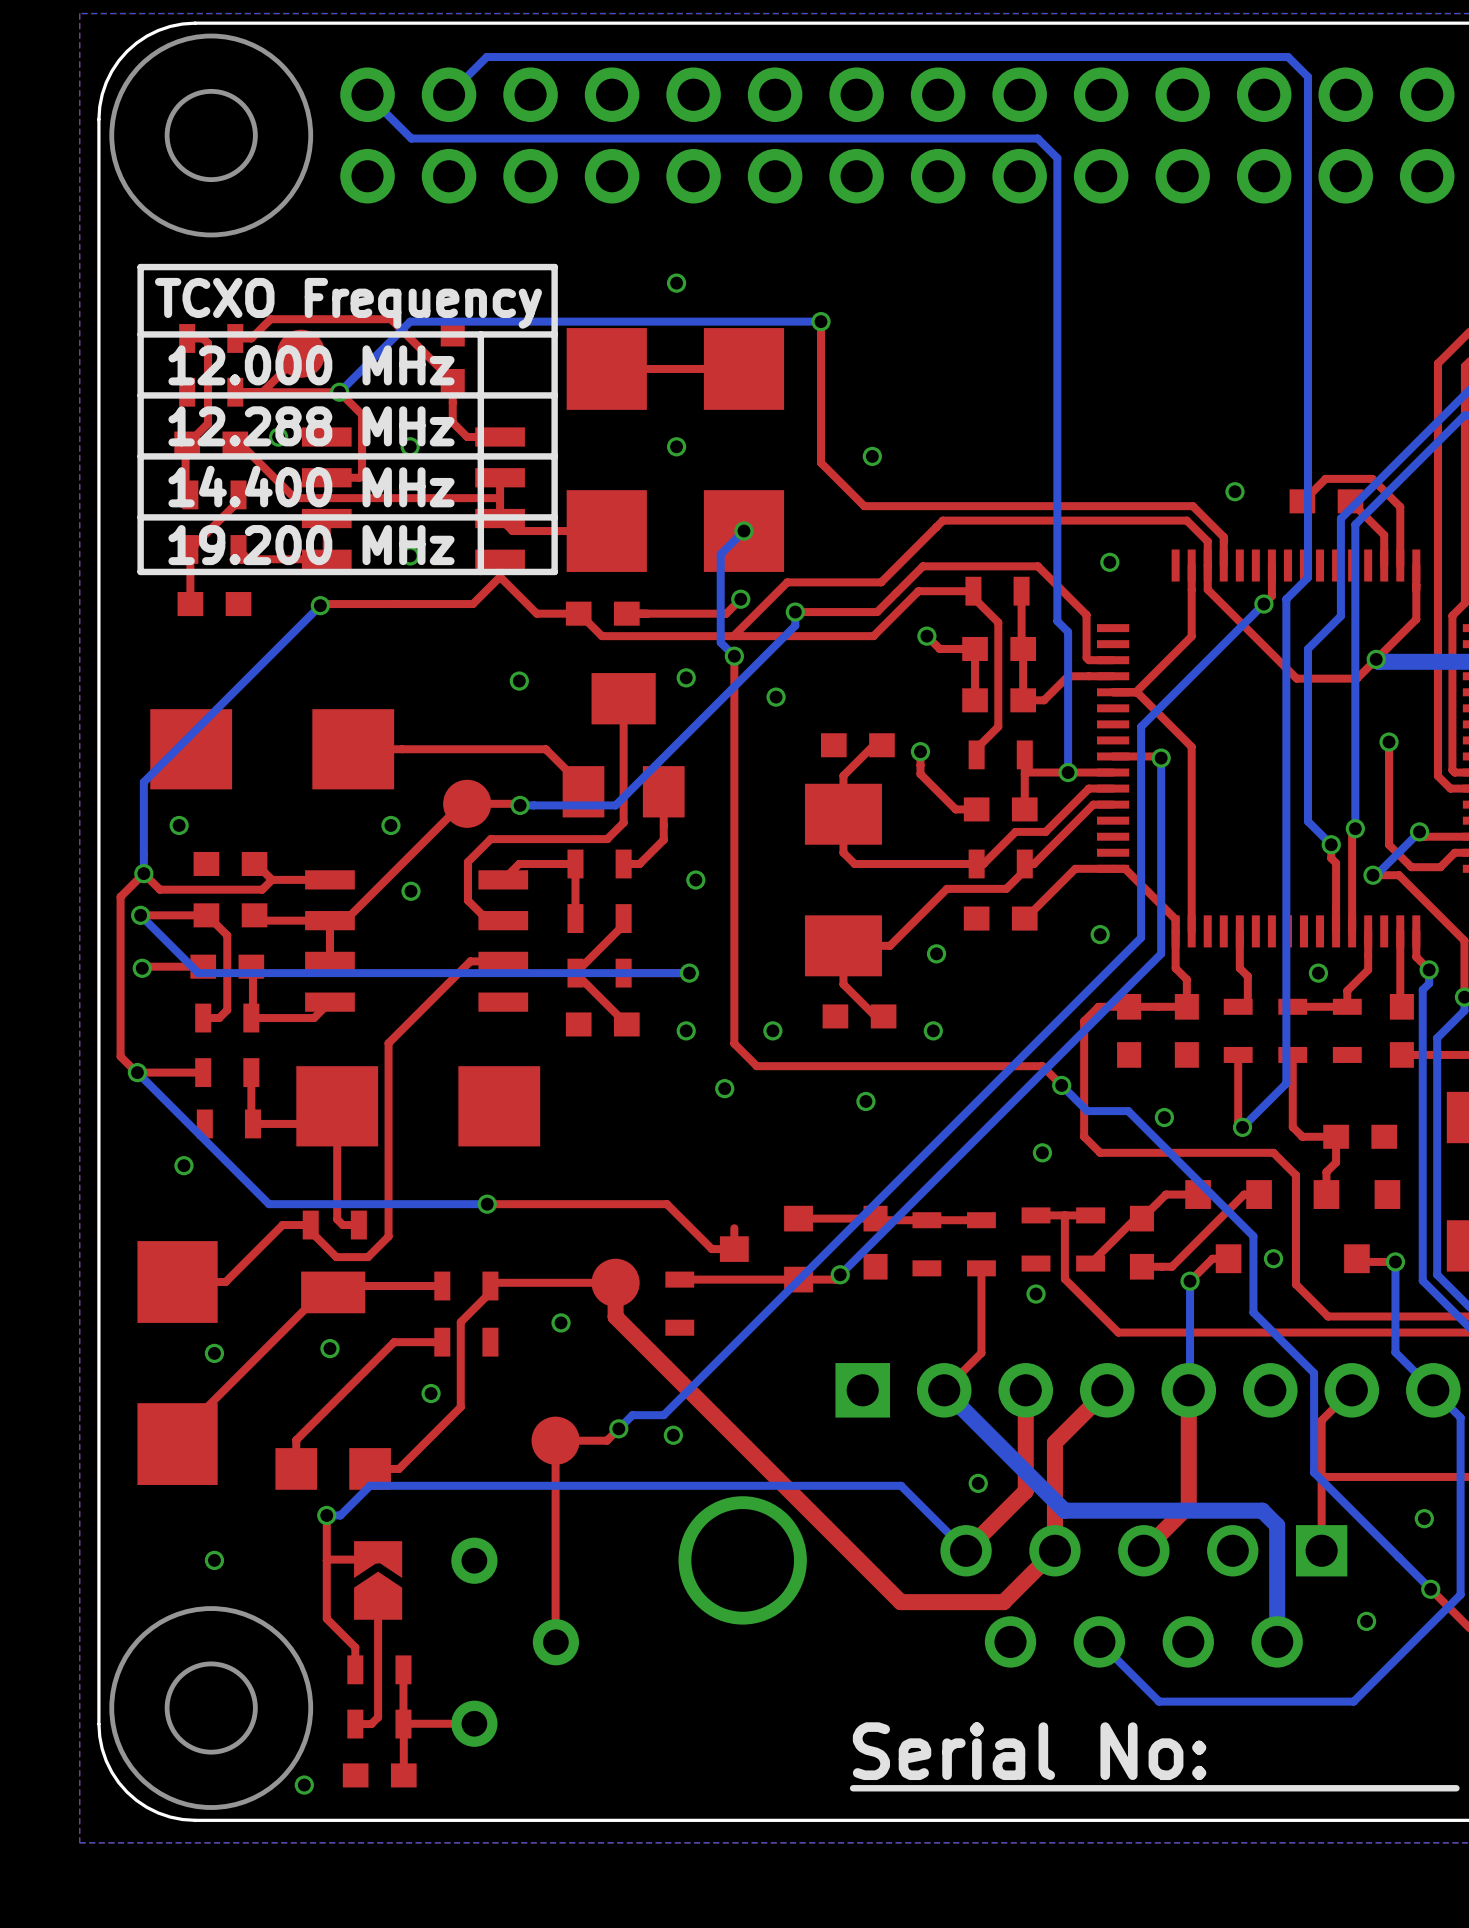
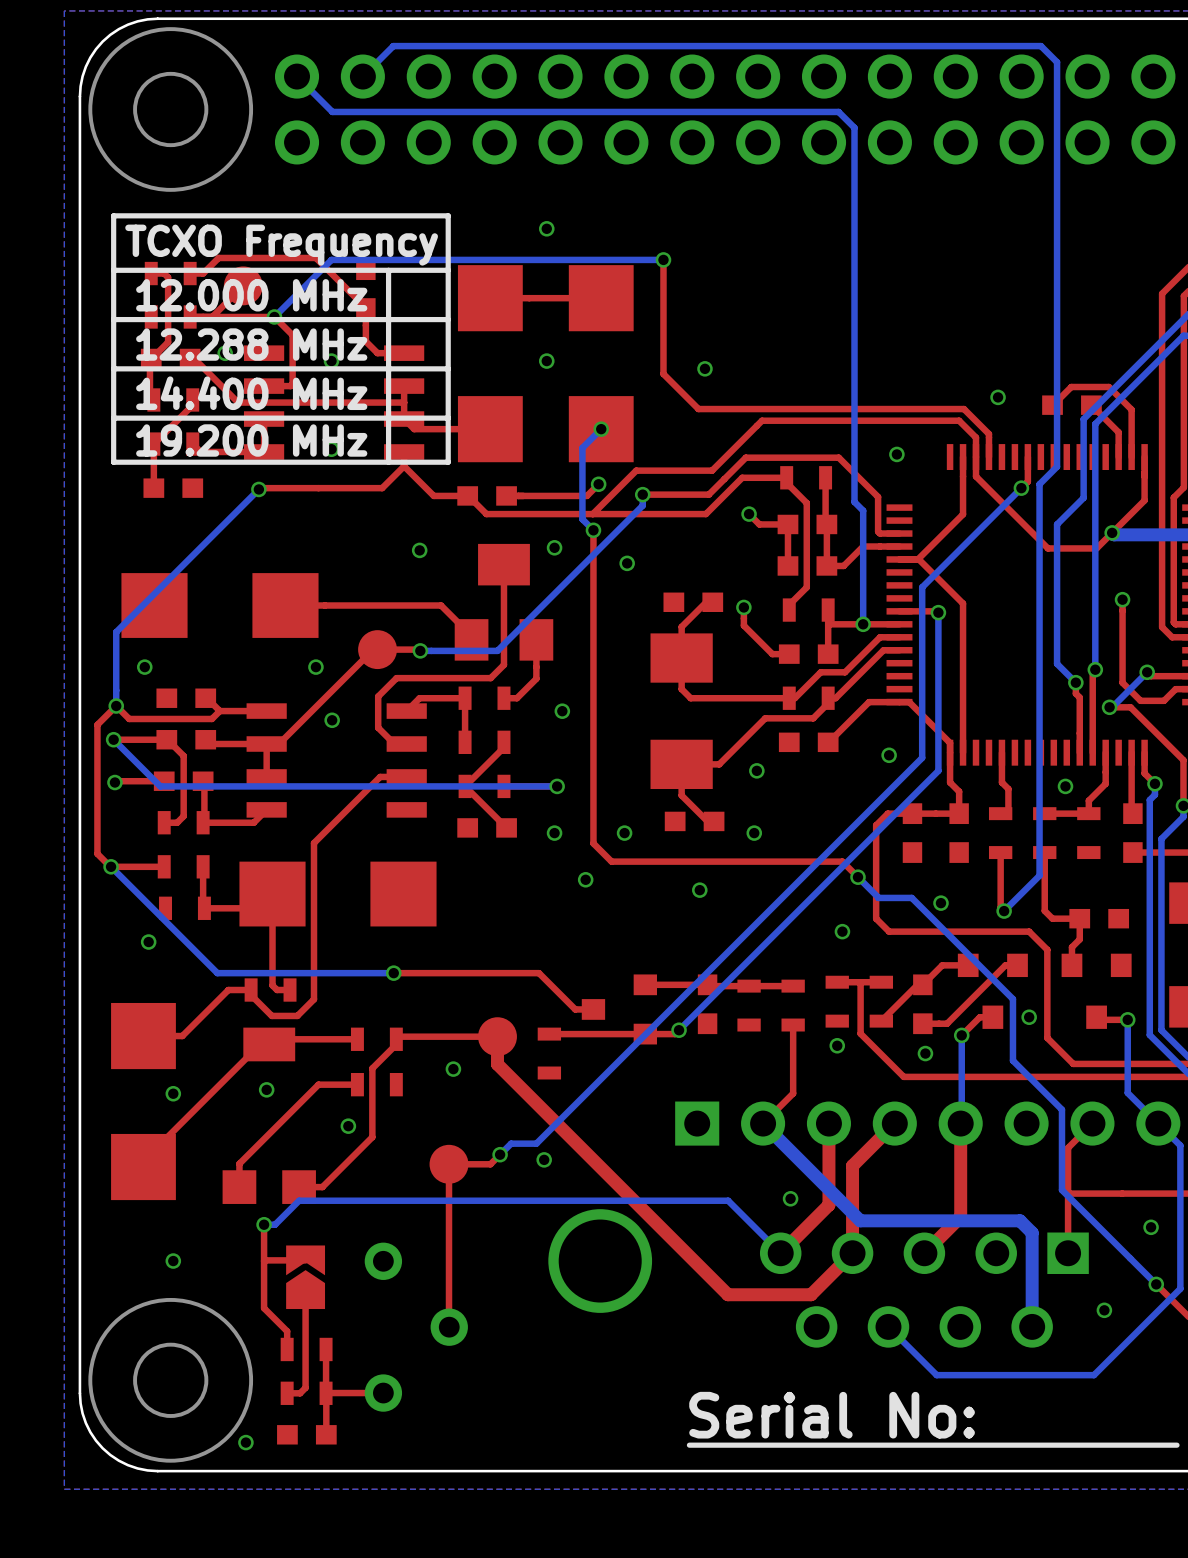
top track: (734, 1228) (734, 1249) -> none
via: none -> (925, 1053)

